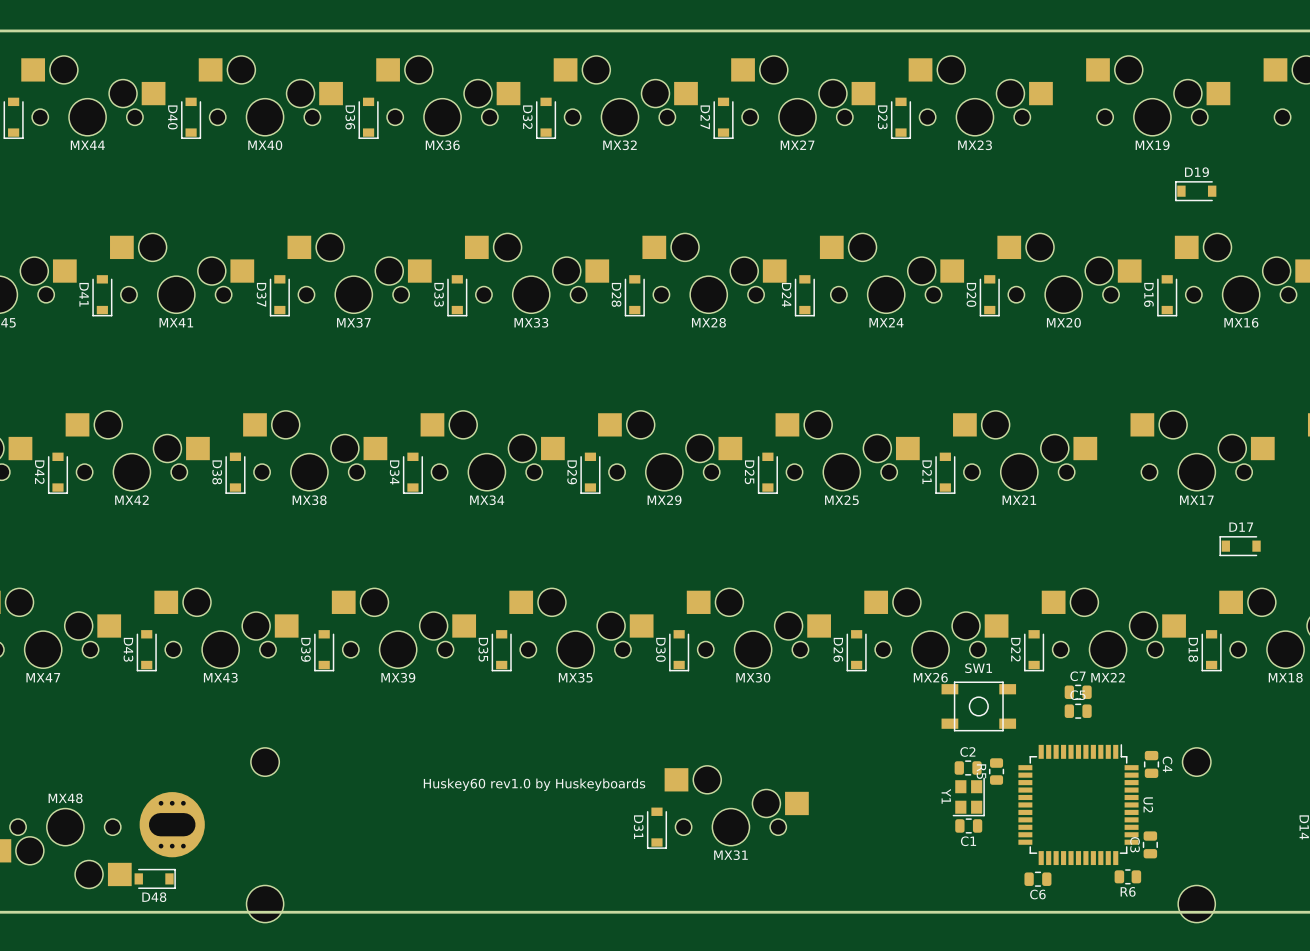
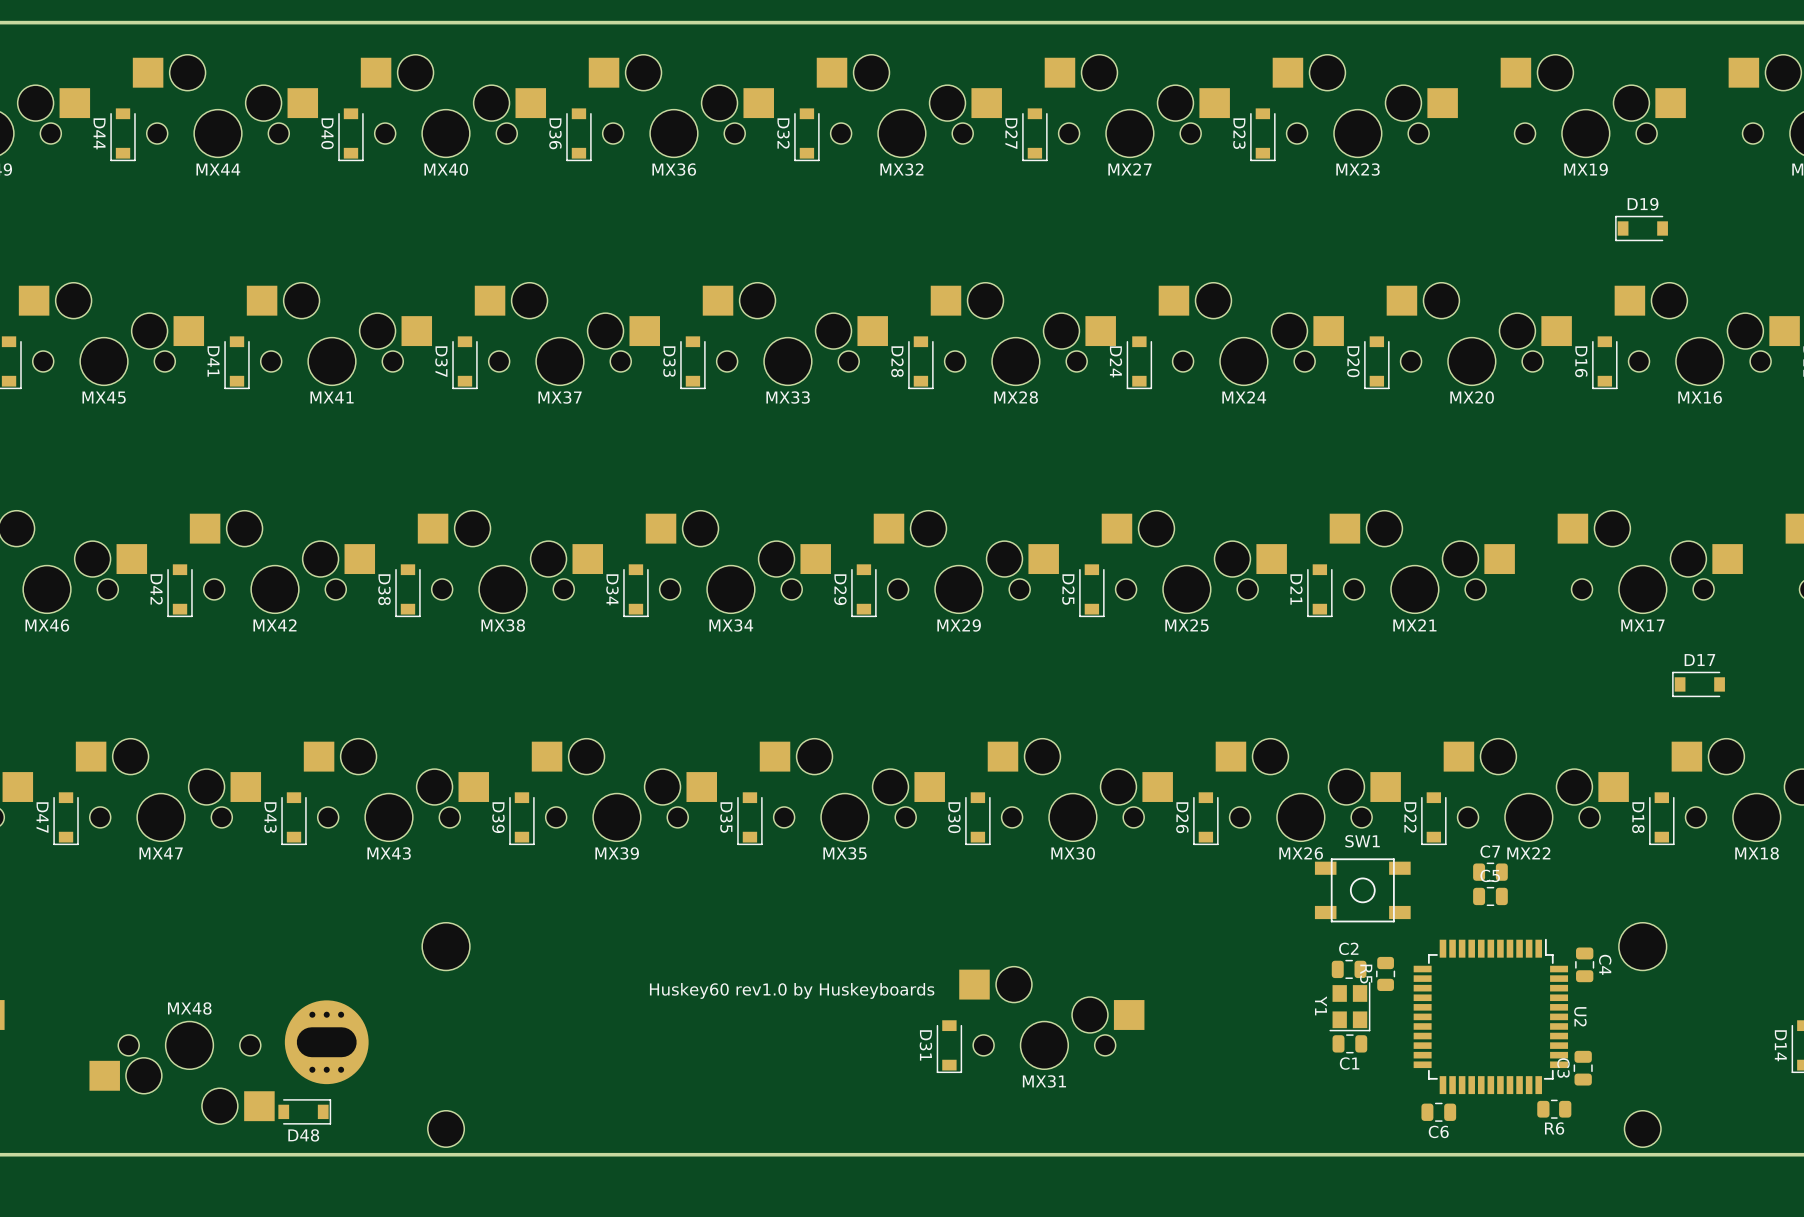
MX31 footprint: [246, 747, 1216, 923] -> [422, 922, 1667, 1148]

